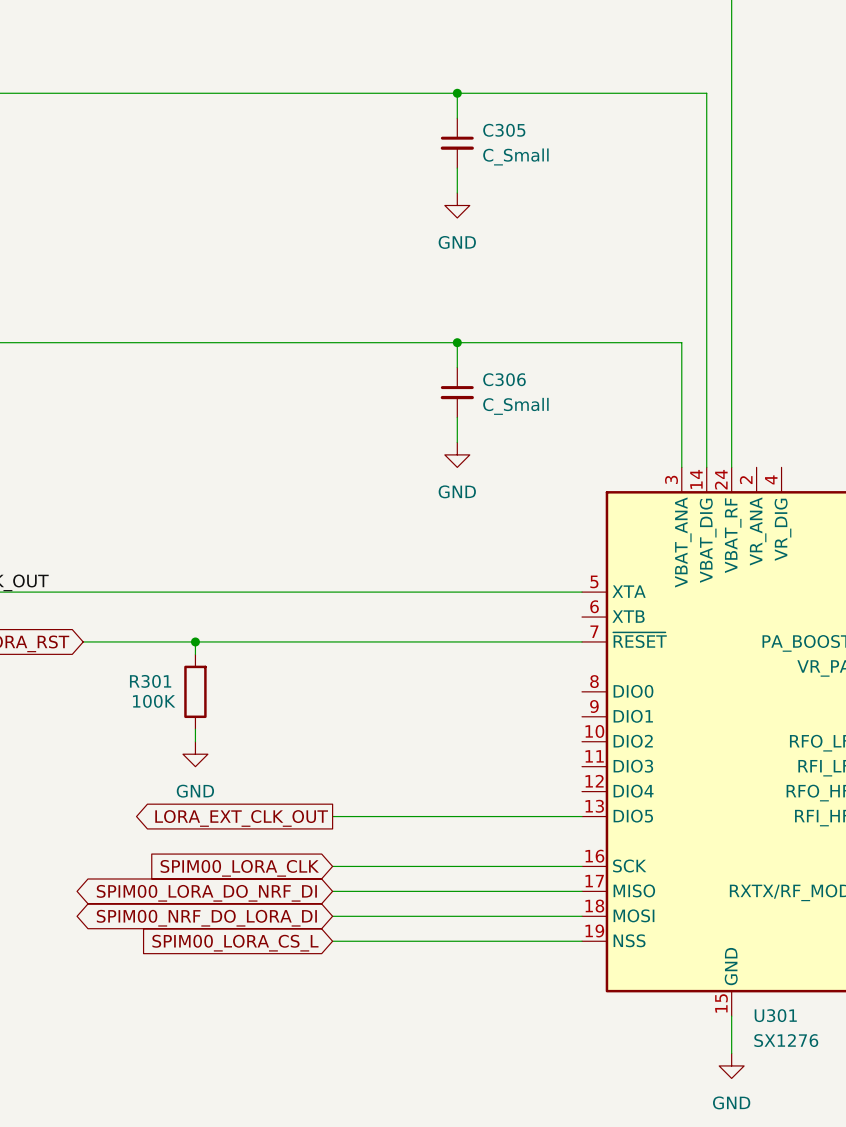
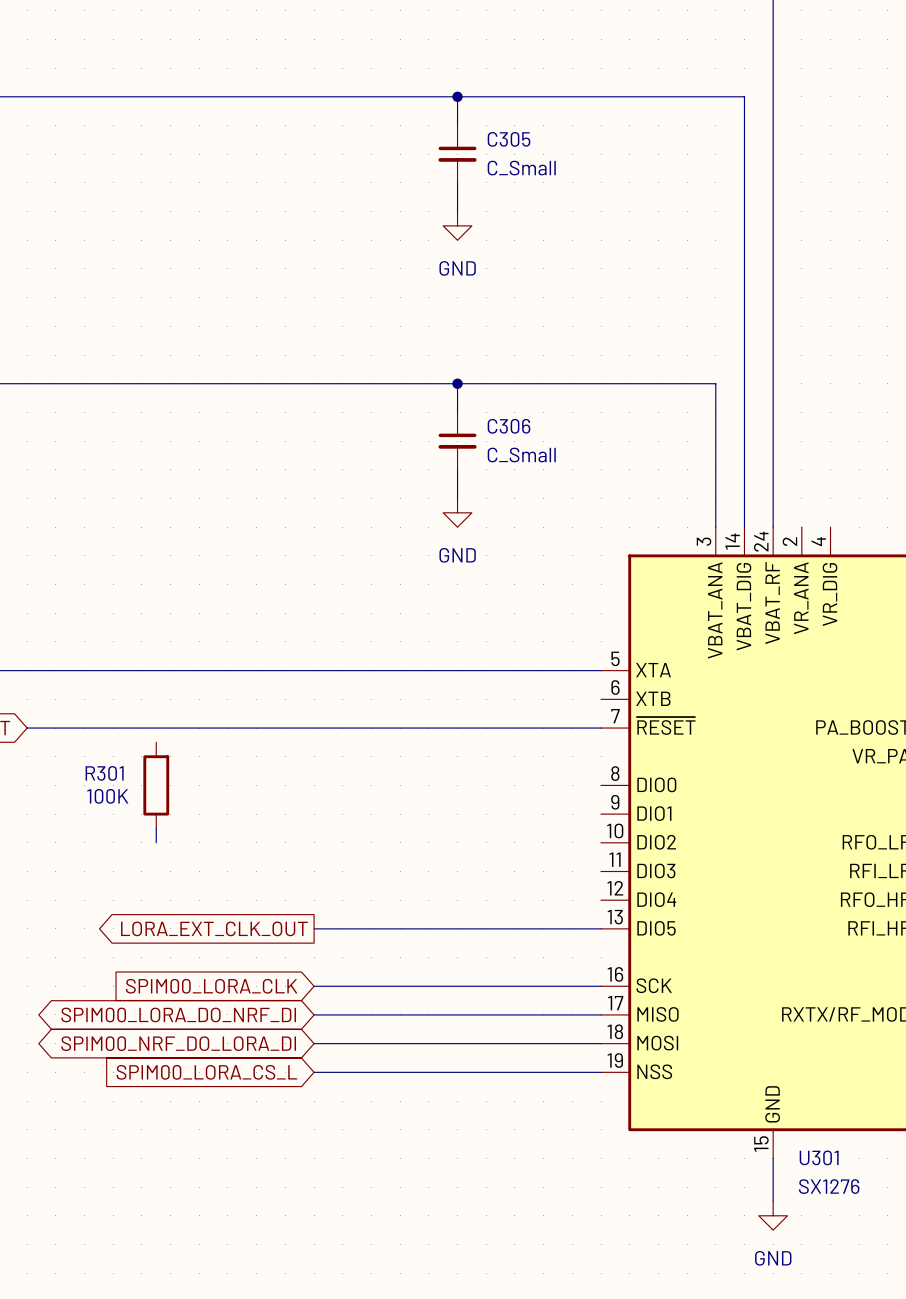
wire: (195, 641) (195, 654) -> none
junction: (195, 641) -> none
power symbol: GND (195, 754) -> none

